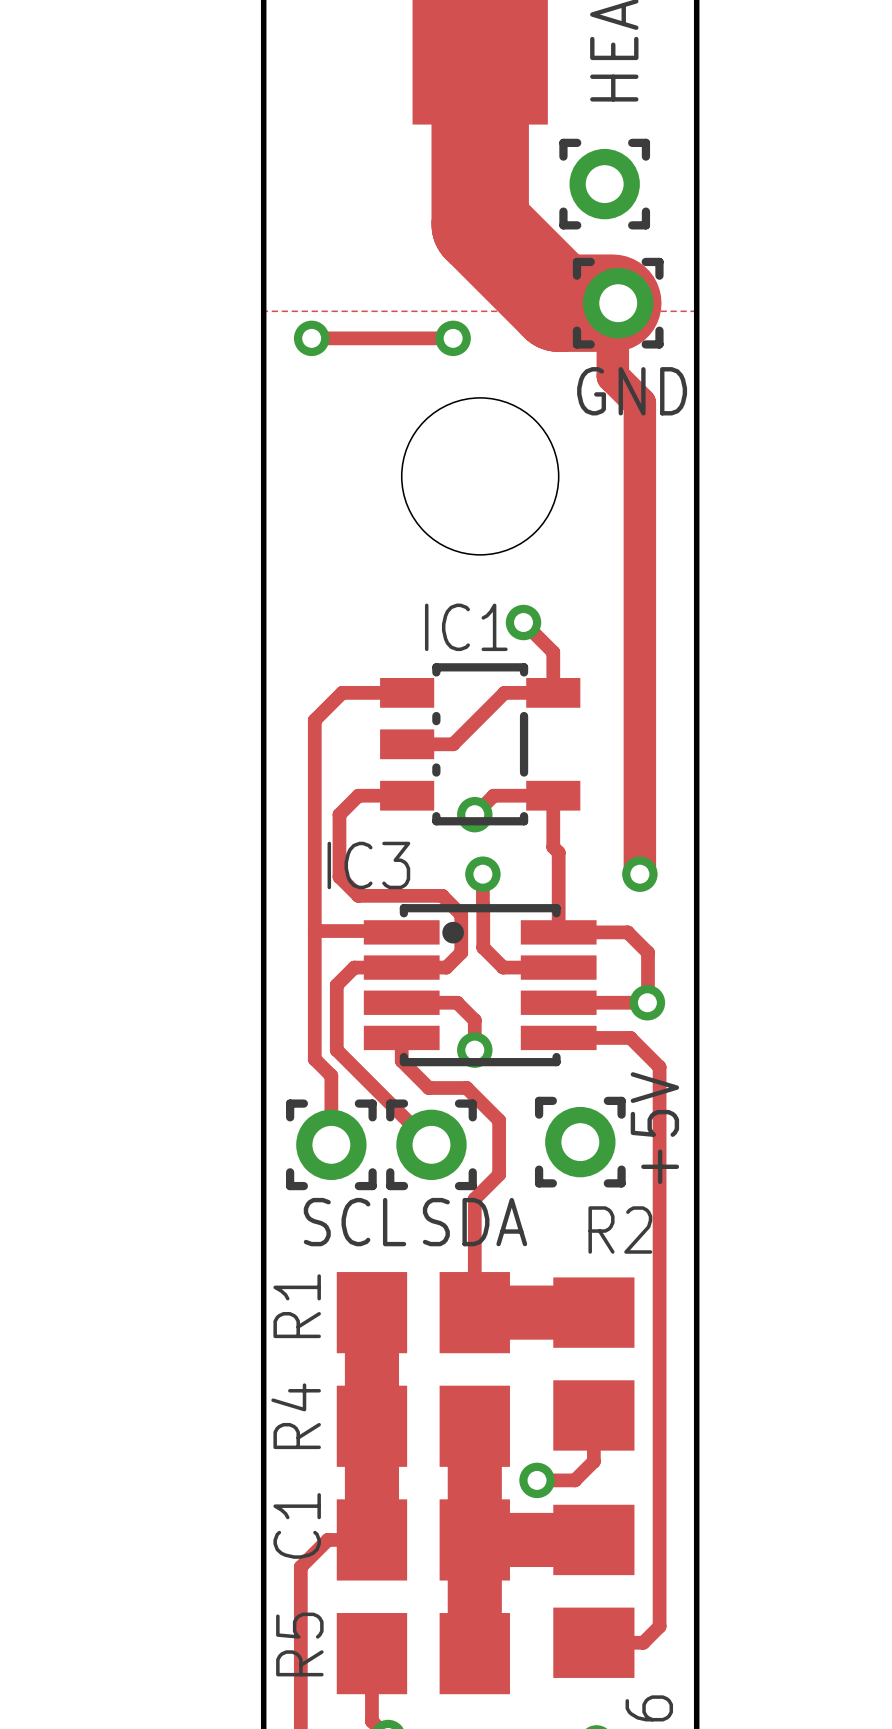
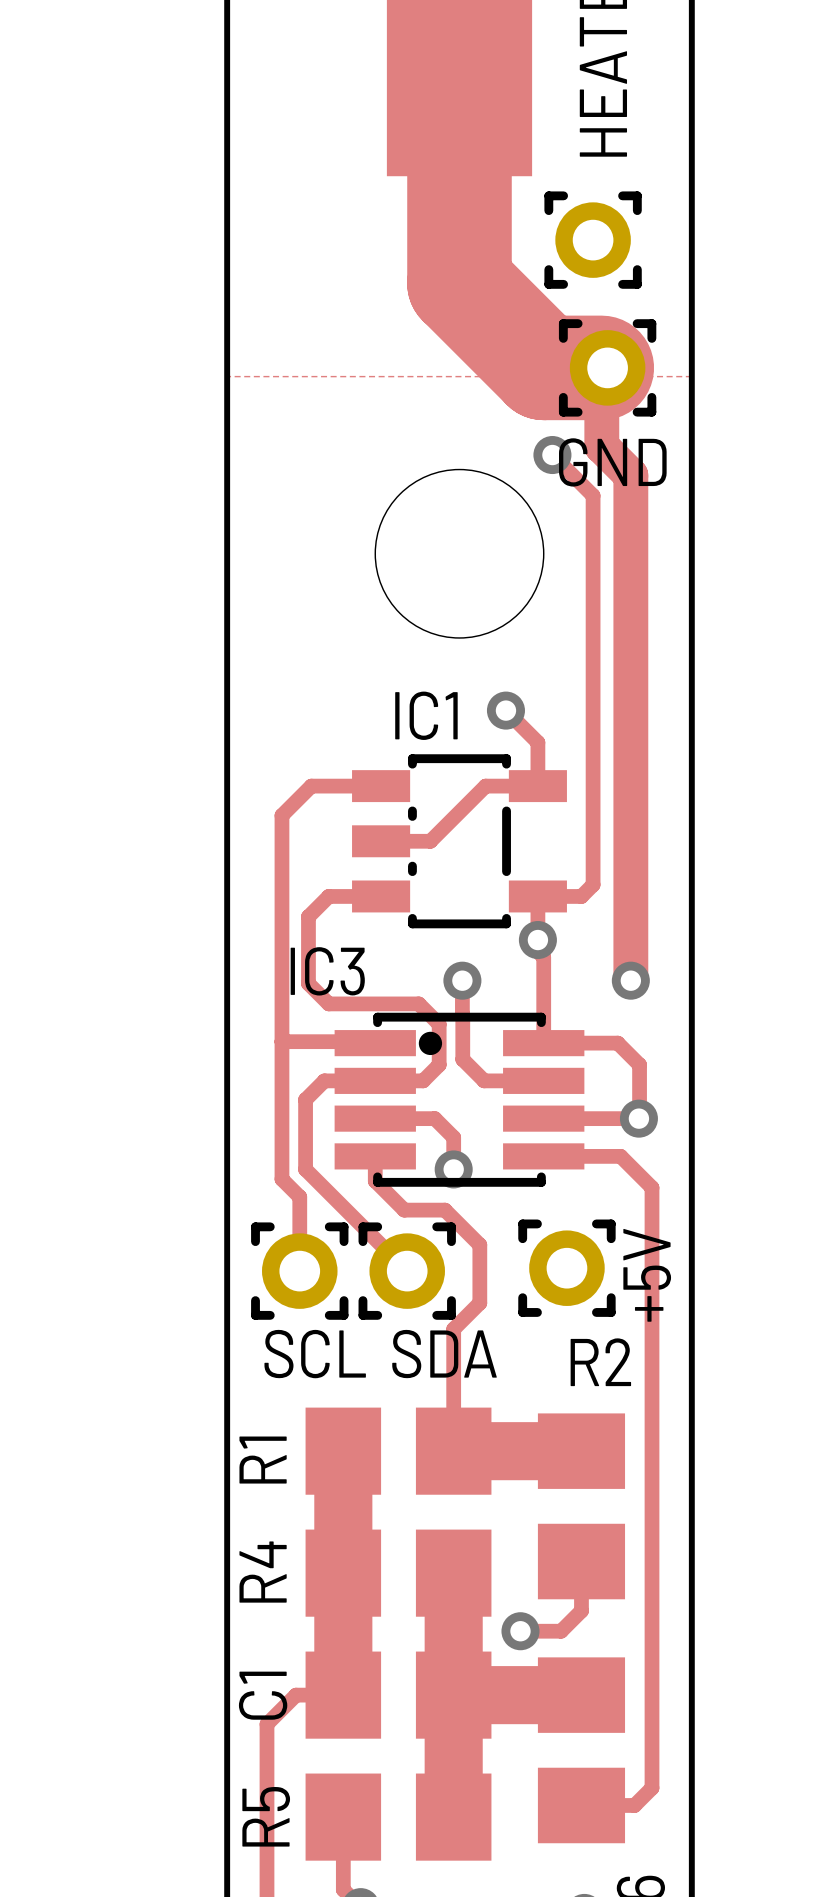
track: (311, 338) (453, 338) -> none
via: (311, 338) -> none
via position: (453, 338) -> (552, 455)
track: (553, 795) (493, 795) (474, 814) -> (537, 896) (581, 896) (593, 884) (593, 495) (552, 455)
via position: (474, 814) -> (537, 940)

